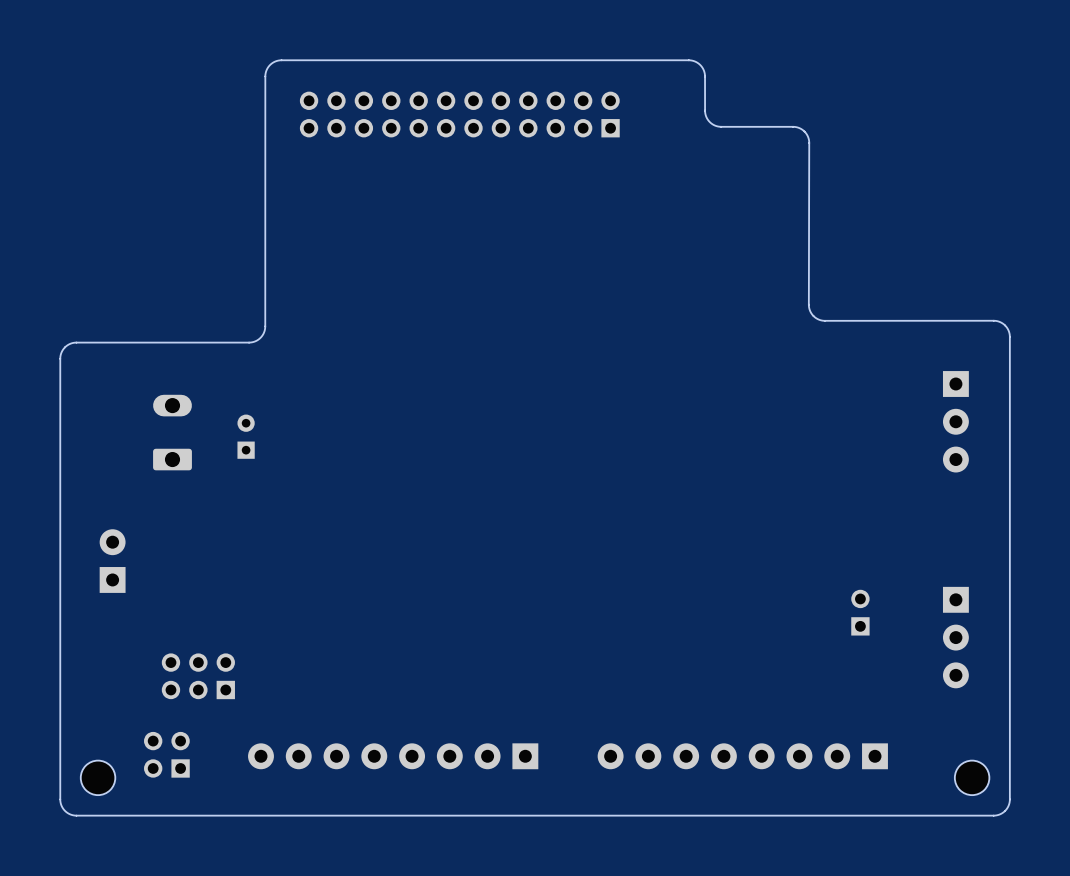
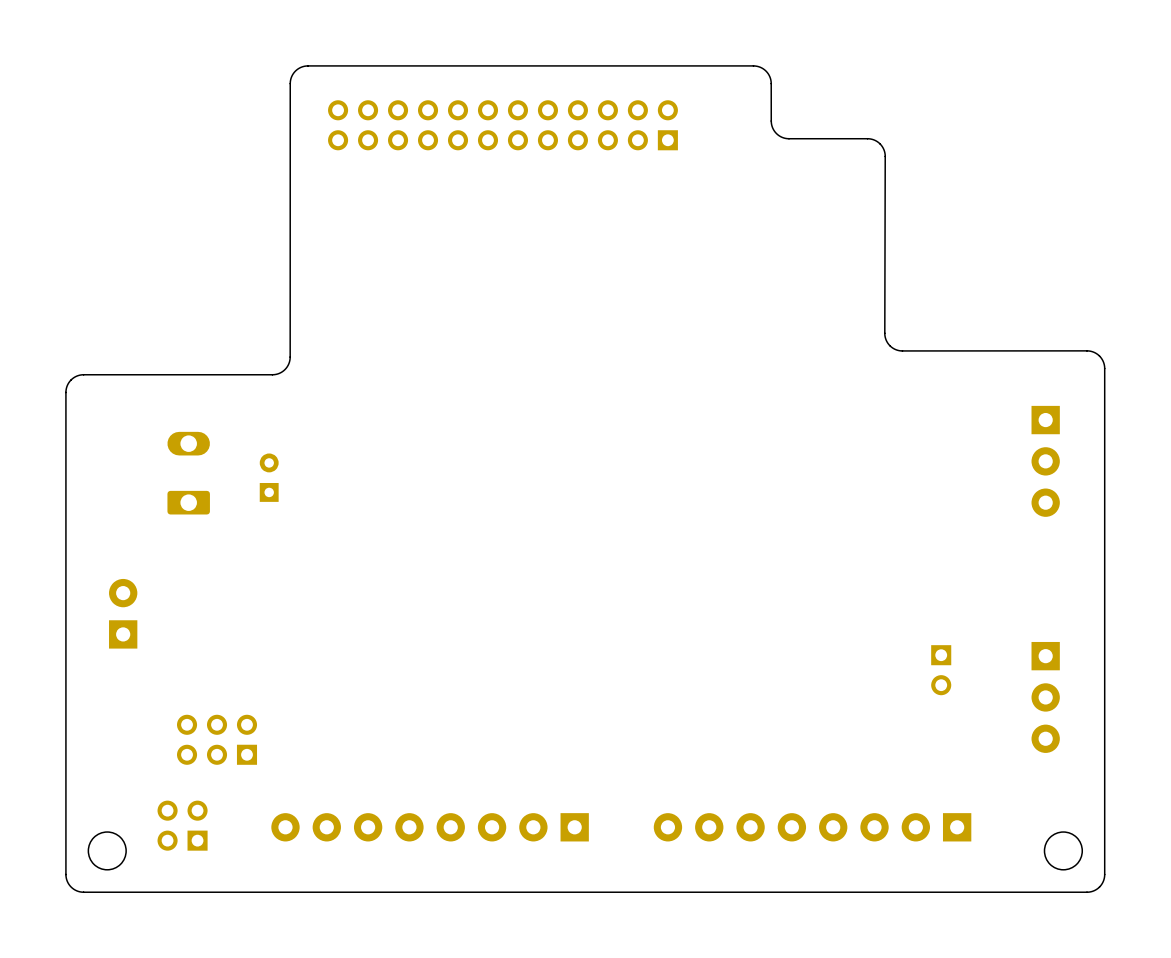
part rotation: 0° (860, 612) -> 180° (941, 670)

